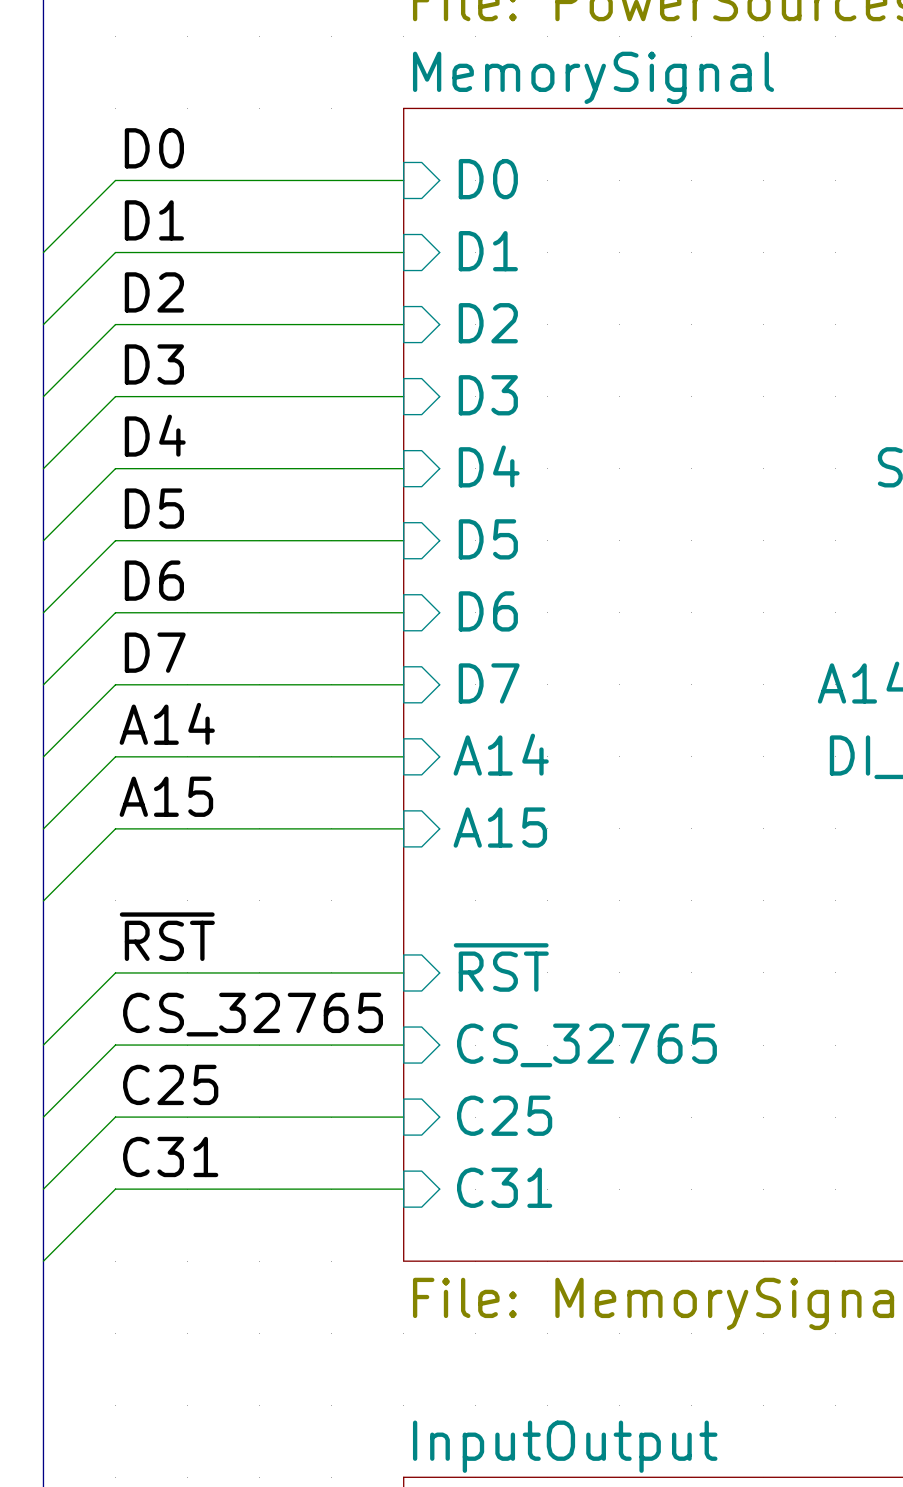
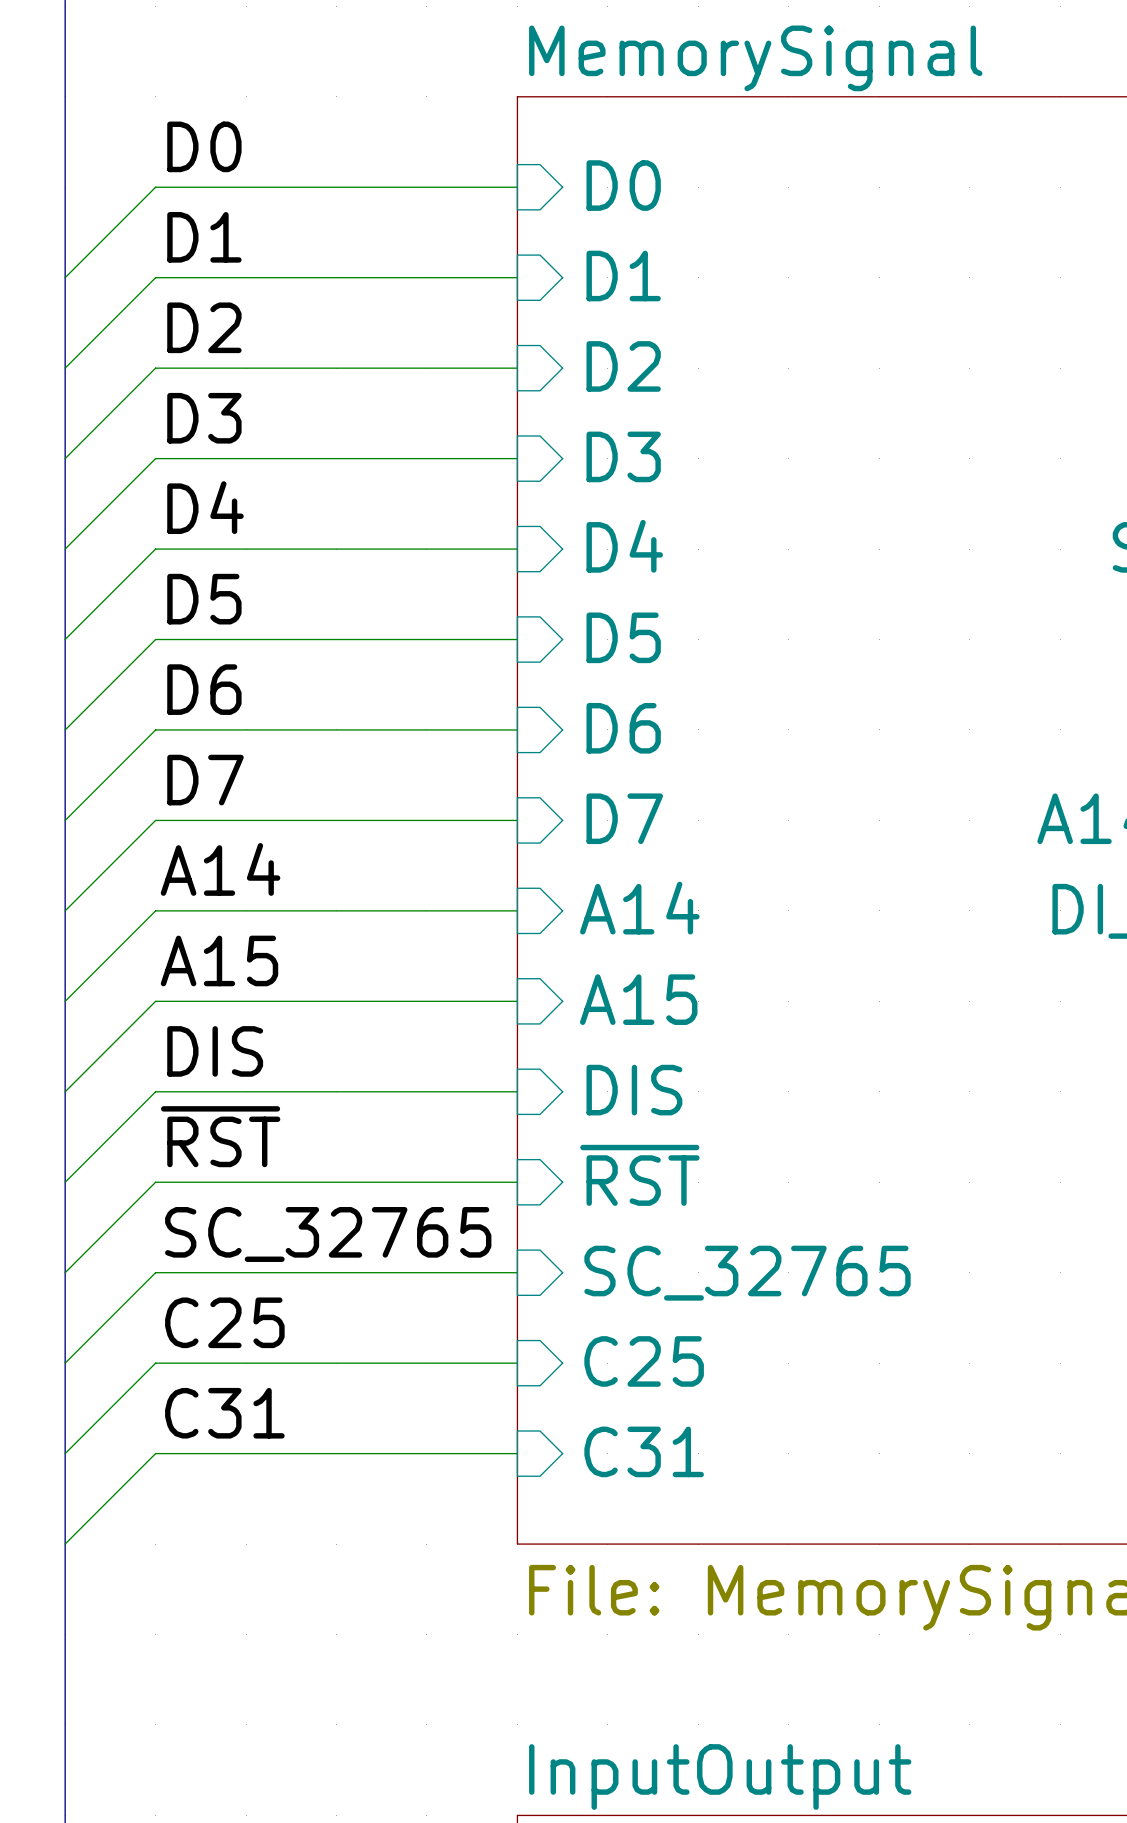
label: none -> DIS (215, 1051)
sheet pin: none -> DIS (634, 1090)
wire: none -> (517, 1091) (155, 1091) (65, 1182)
label: CS_32765 (253, 1014) -> SC_32765 (328, 1234)
sheet pin: CS_32765 (586, 1045) -> SC_32765 (747, 1273)

